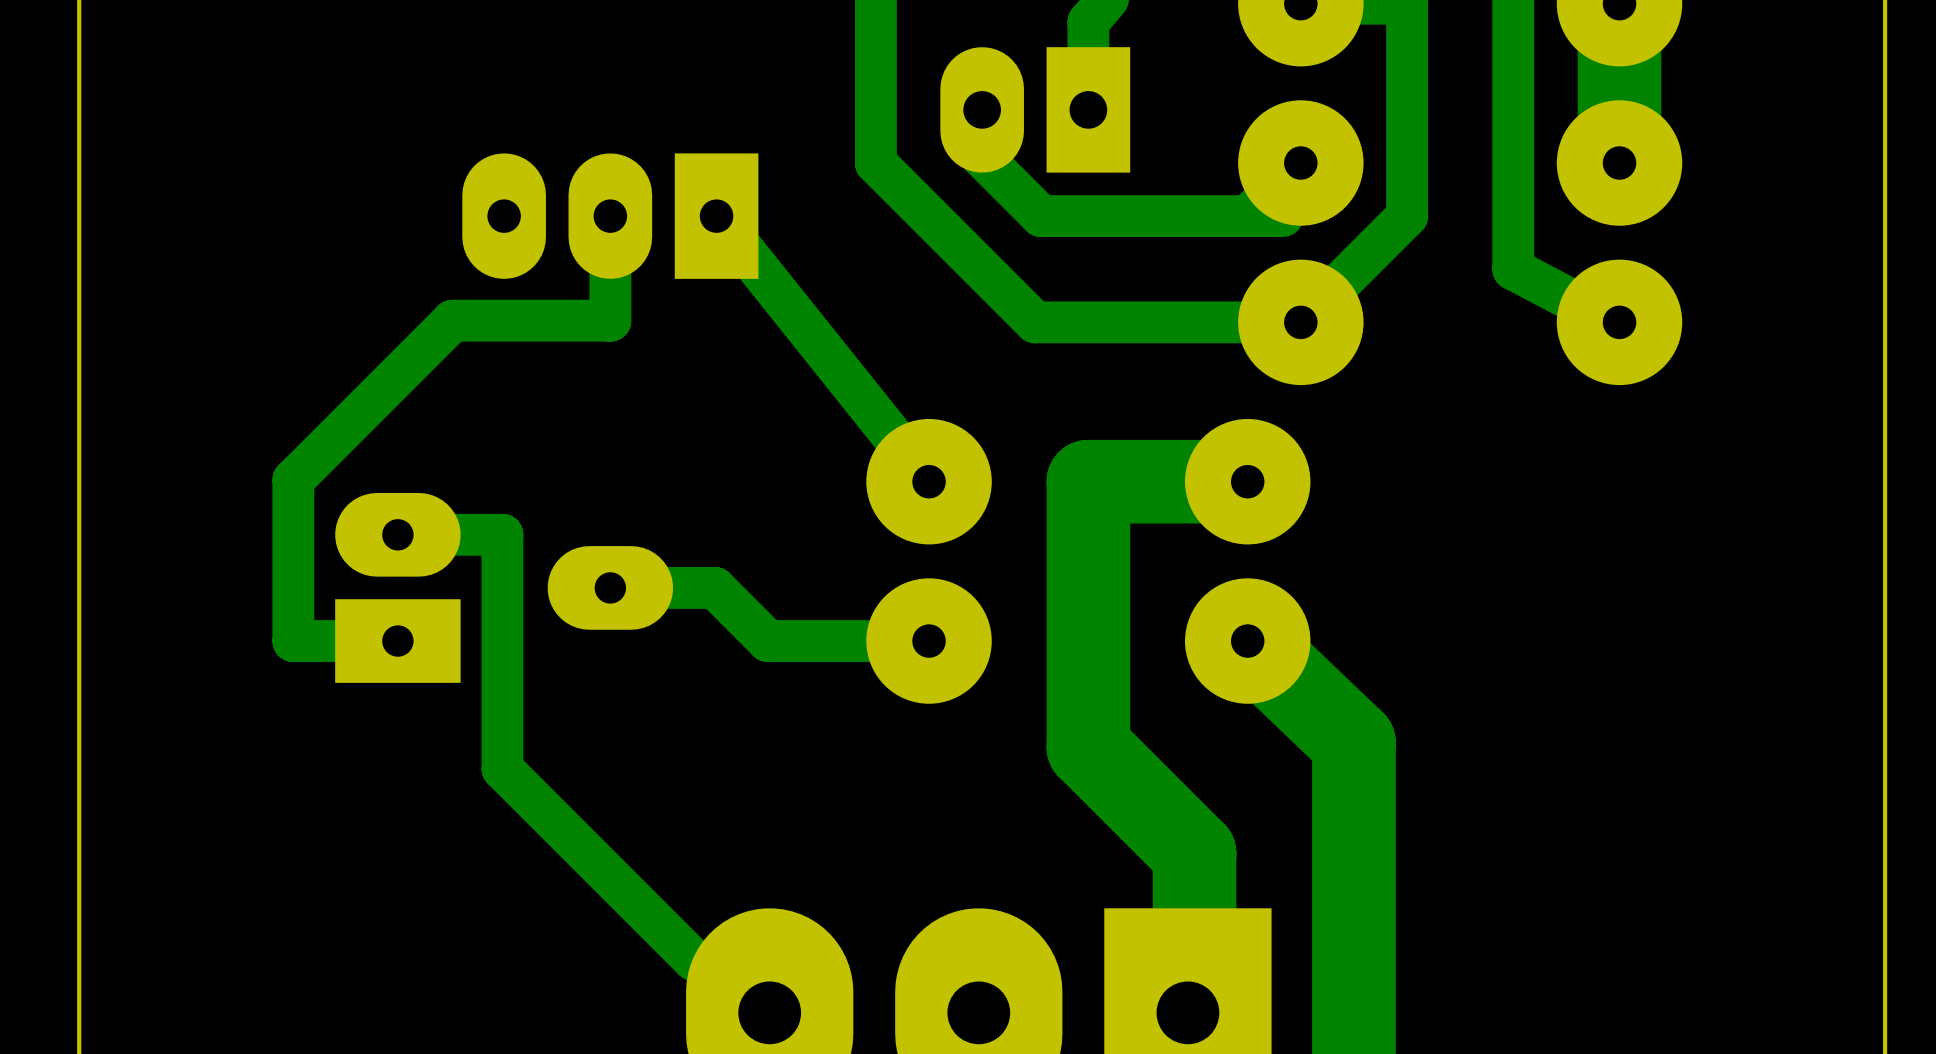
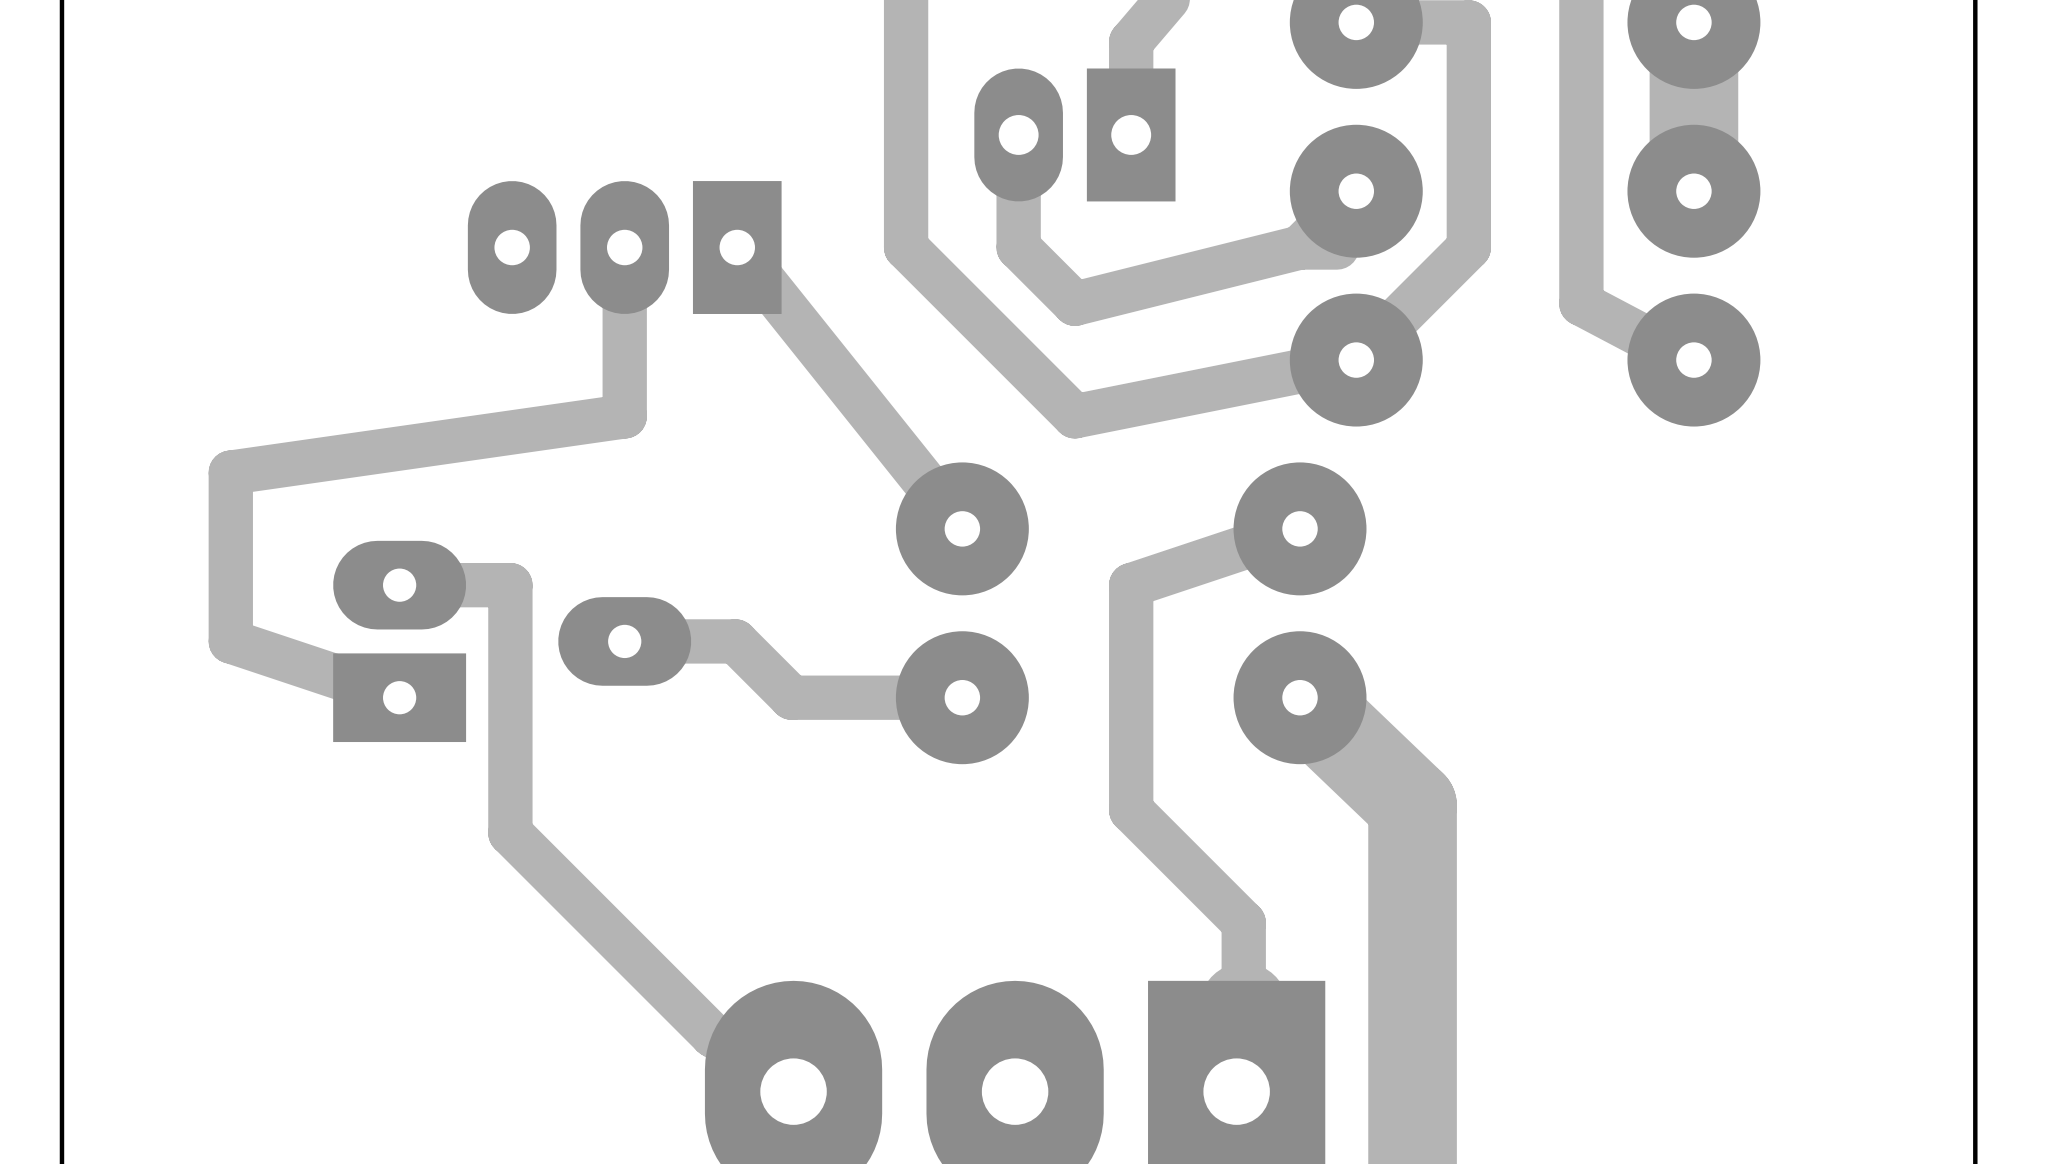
track: (982, 157) (1041, 216) (1247, 216) -> (1018, 184) (1018, 247) (1074, 303) (1300, 247)
track: (875, 163) (1035, 322) (1300, 322) -> (906, 191) (906, 247) (1074, 416) (1356, 360)
track: (610, 320) (452, 320) (293, 480) (293, 641) (397, 641) -> (624, 358) (624, 416) (230, 472) (230, 641) (399, 697)
track: (1247, 481) (1088, 481) (1088, 534) -> (1300, 528) (1131, 585)
track width: thick (1088, 534) (1088, 747) (1194, 853) (1194, 933) -> thin (1131, 585) (1131, 810) (1243, 922) (1243, 1007)

